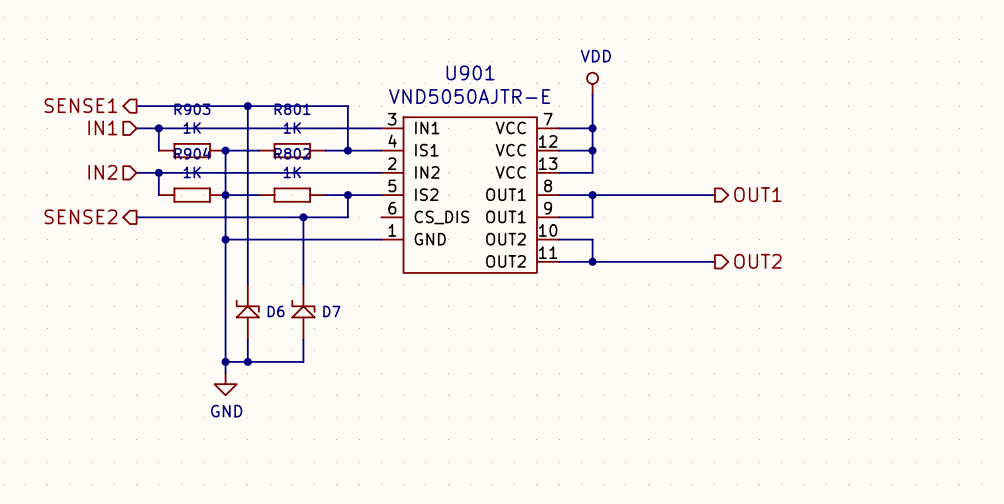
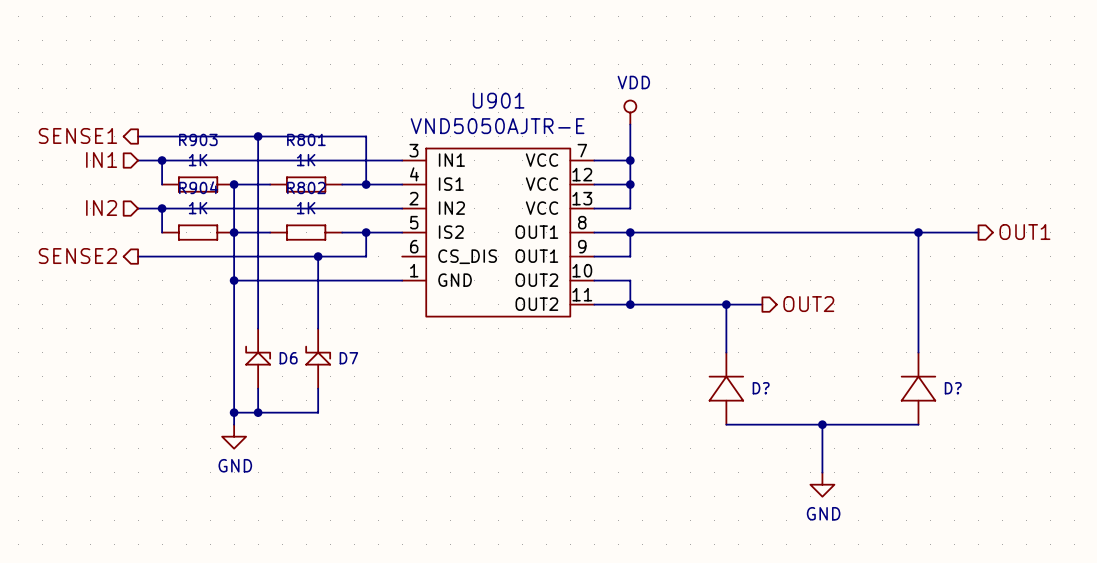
hierarchical label position: OUT1 (757, 194) -> OUT1 (1024, 232)
wire: none -> (762, 232) (978, 232)
wire: none -> (918, 232) (918, 352)
junction: none -> (918, 232)
wire: none -> (726, 304) (726, 352)
junction: none -> (726, 304)
D?: none -> (726, 388)
D?: none -> (918, 388)
wire: none -> (726, 424) (918, 424)
wire: none -> (822, 424) (822, 472)
junction: none -> (822, 424)
power symbol: none -> GND (822, 484)

